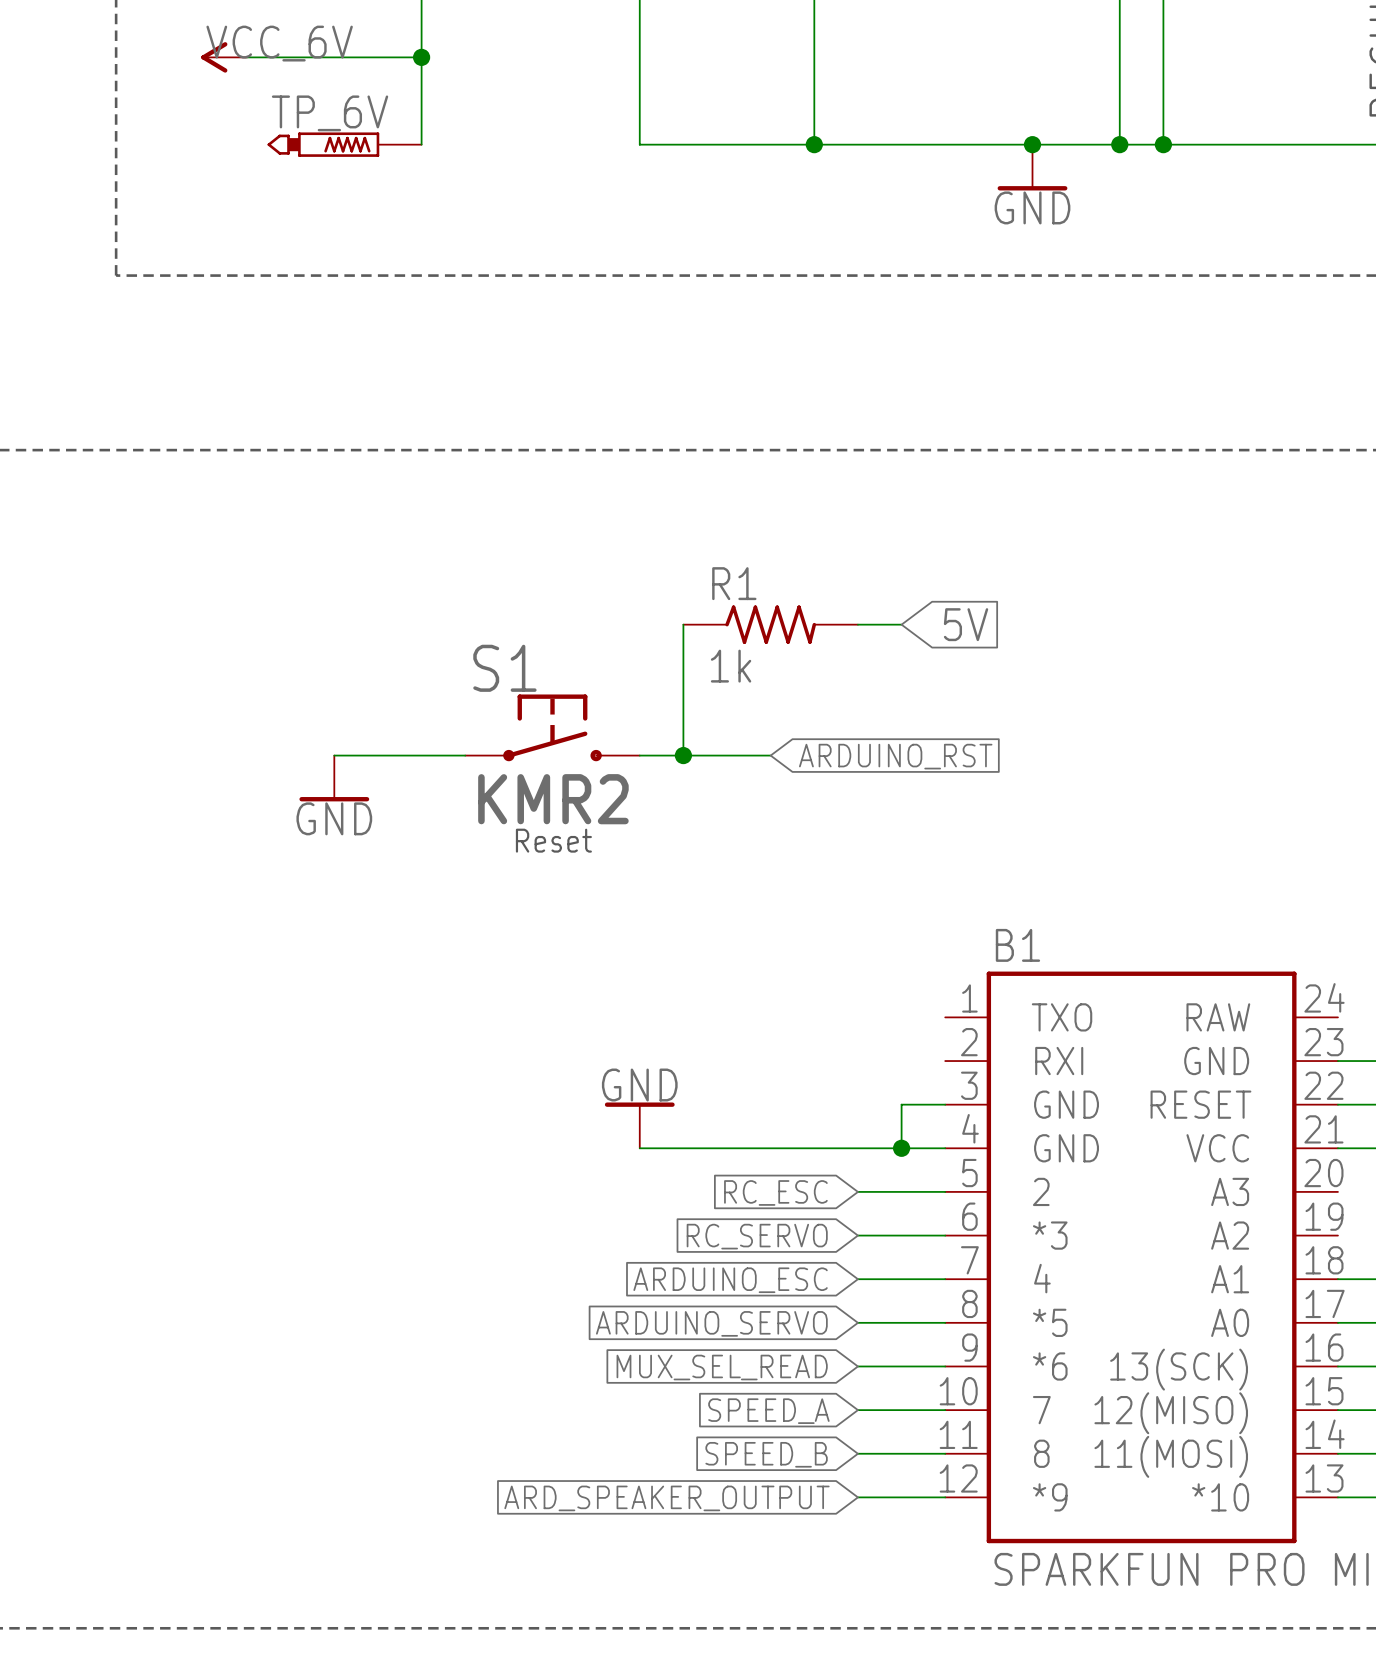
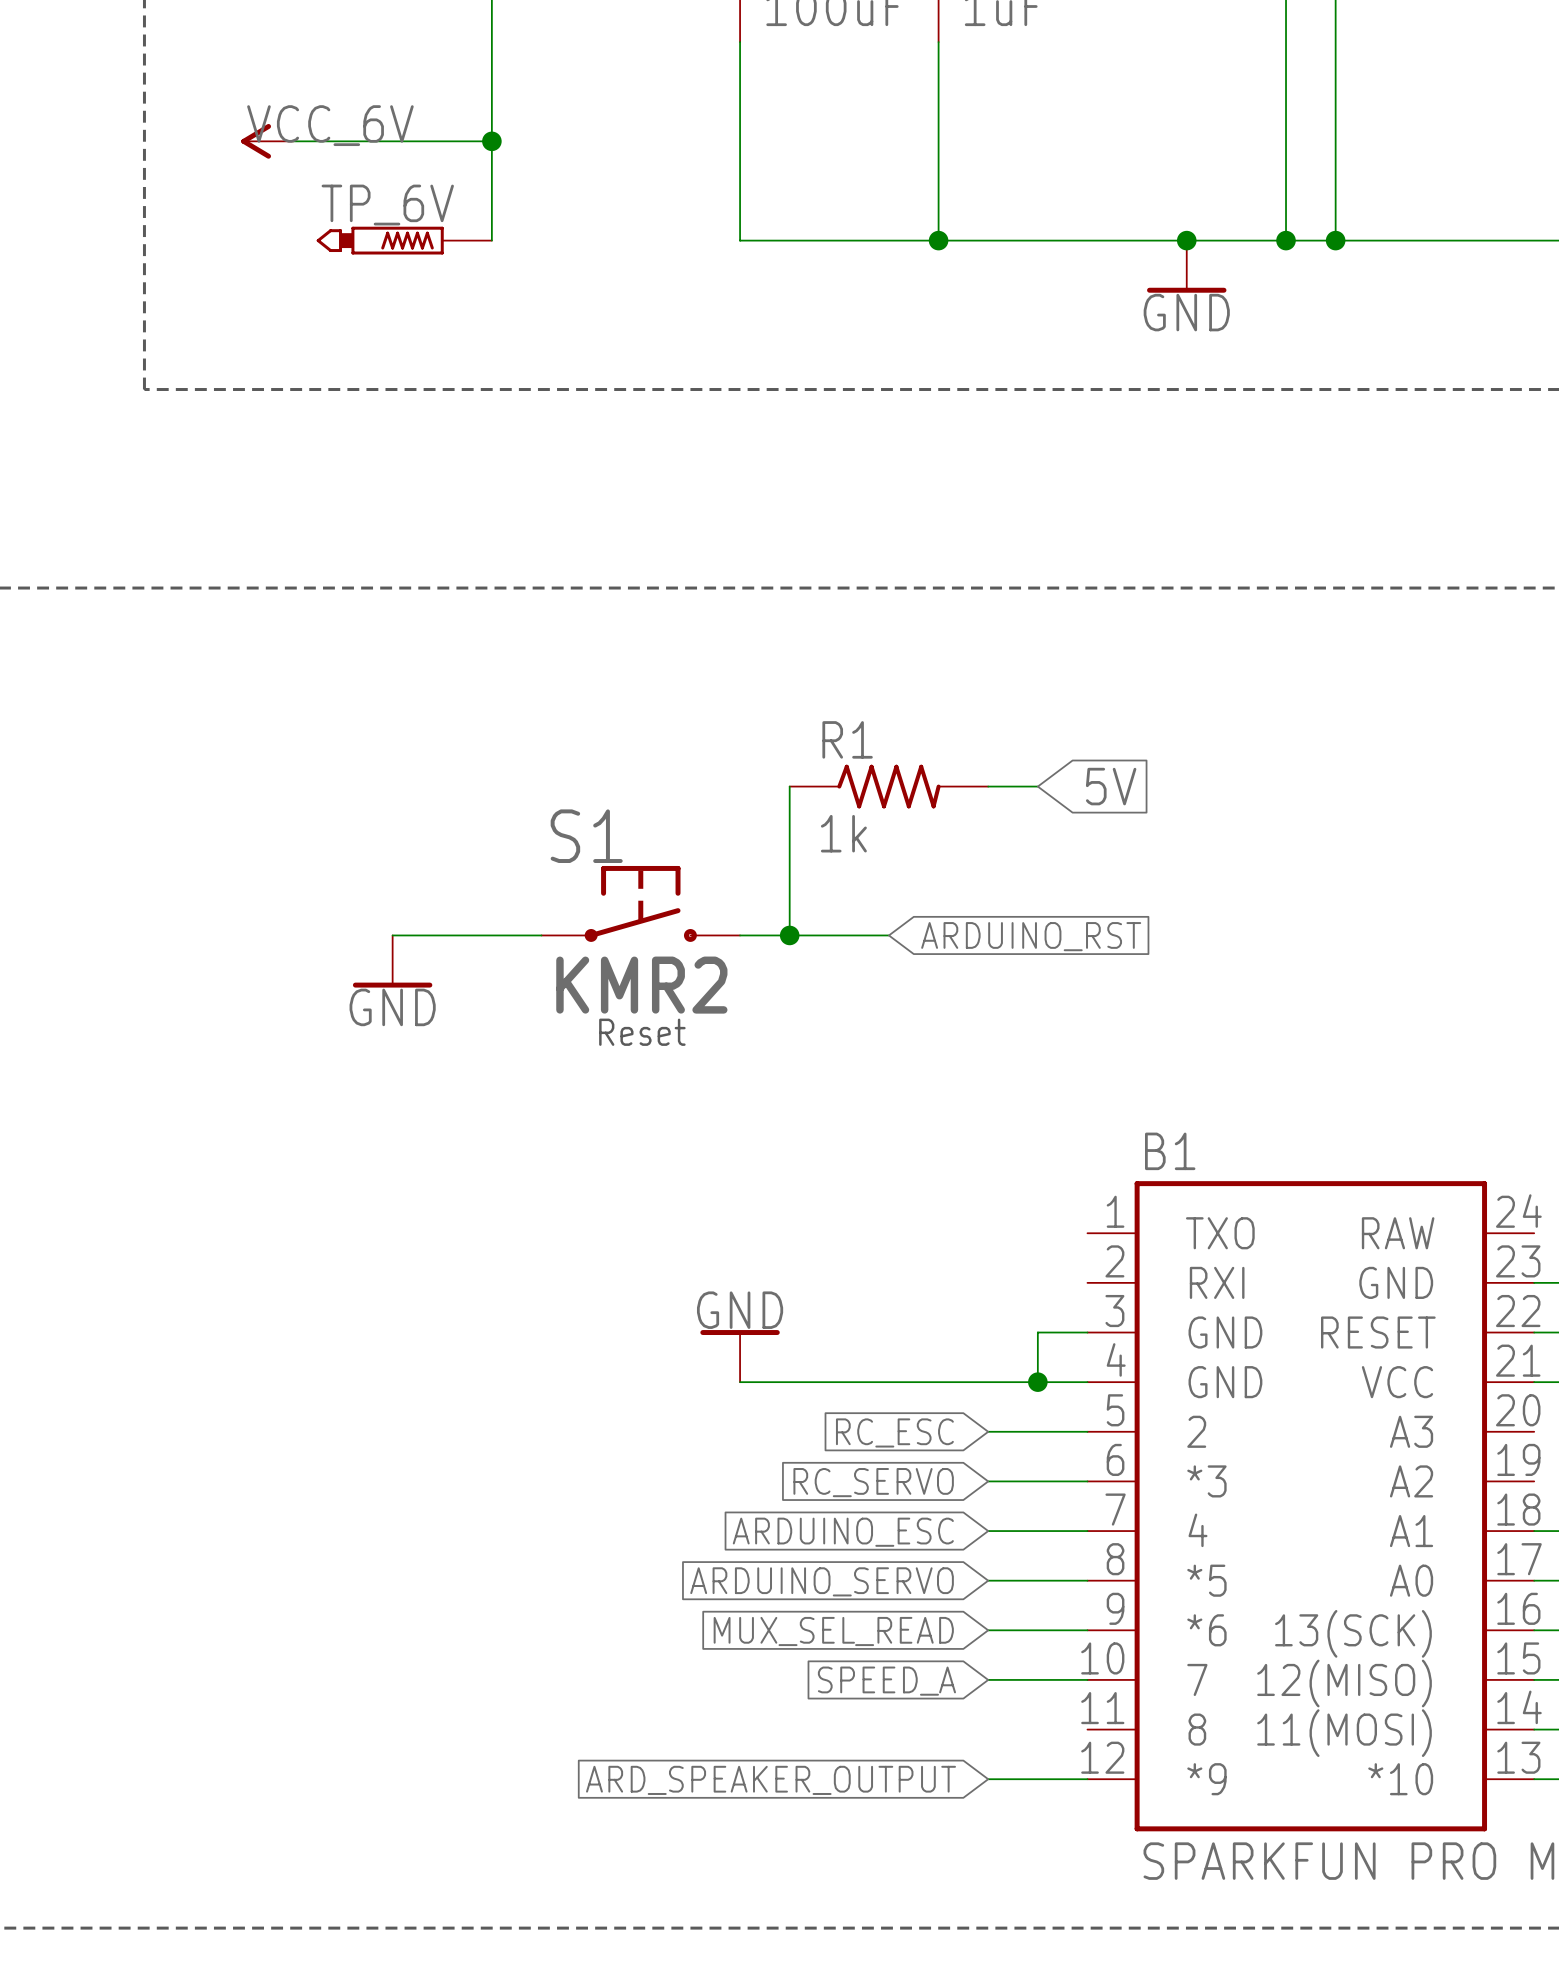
wire: (857, 1453) (945, 1453) -> none
global label: SPEED_B (766, 1454) -> none

